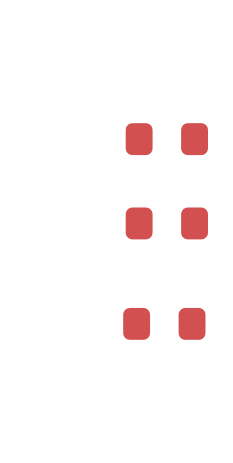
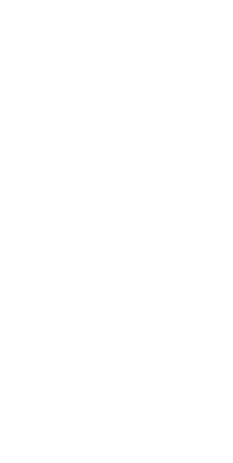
part: (166, 139) -> none
part: (166, 223) -> none
part: (164, 323) -> none

